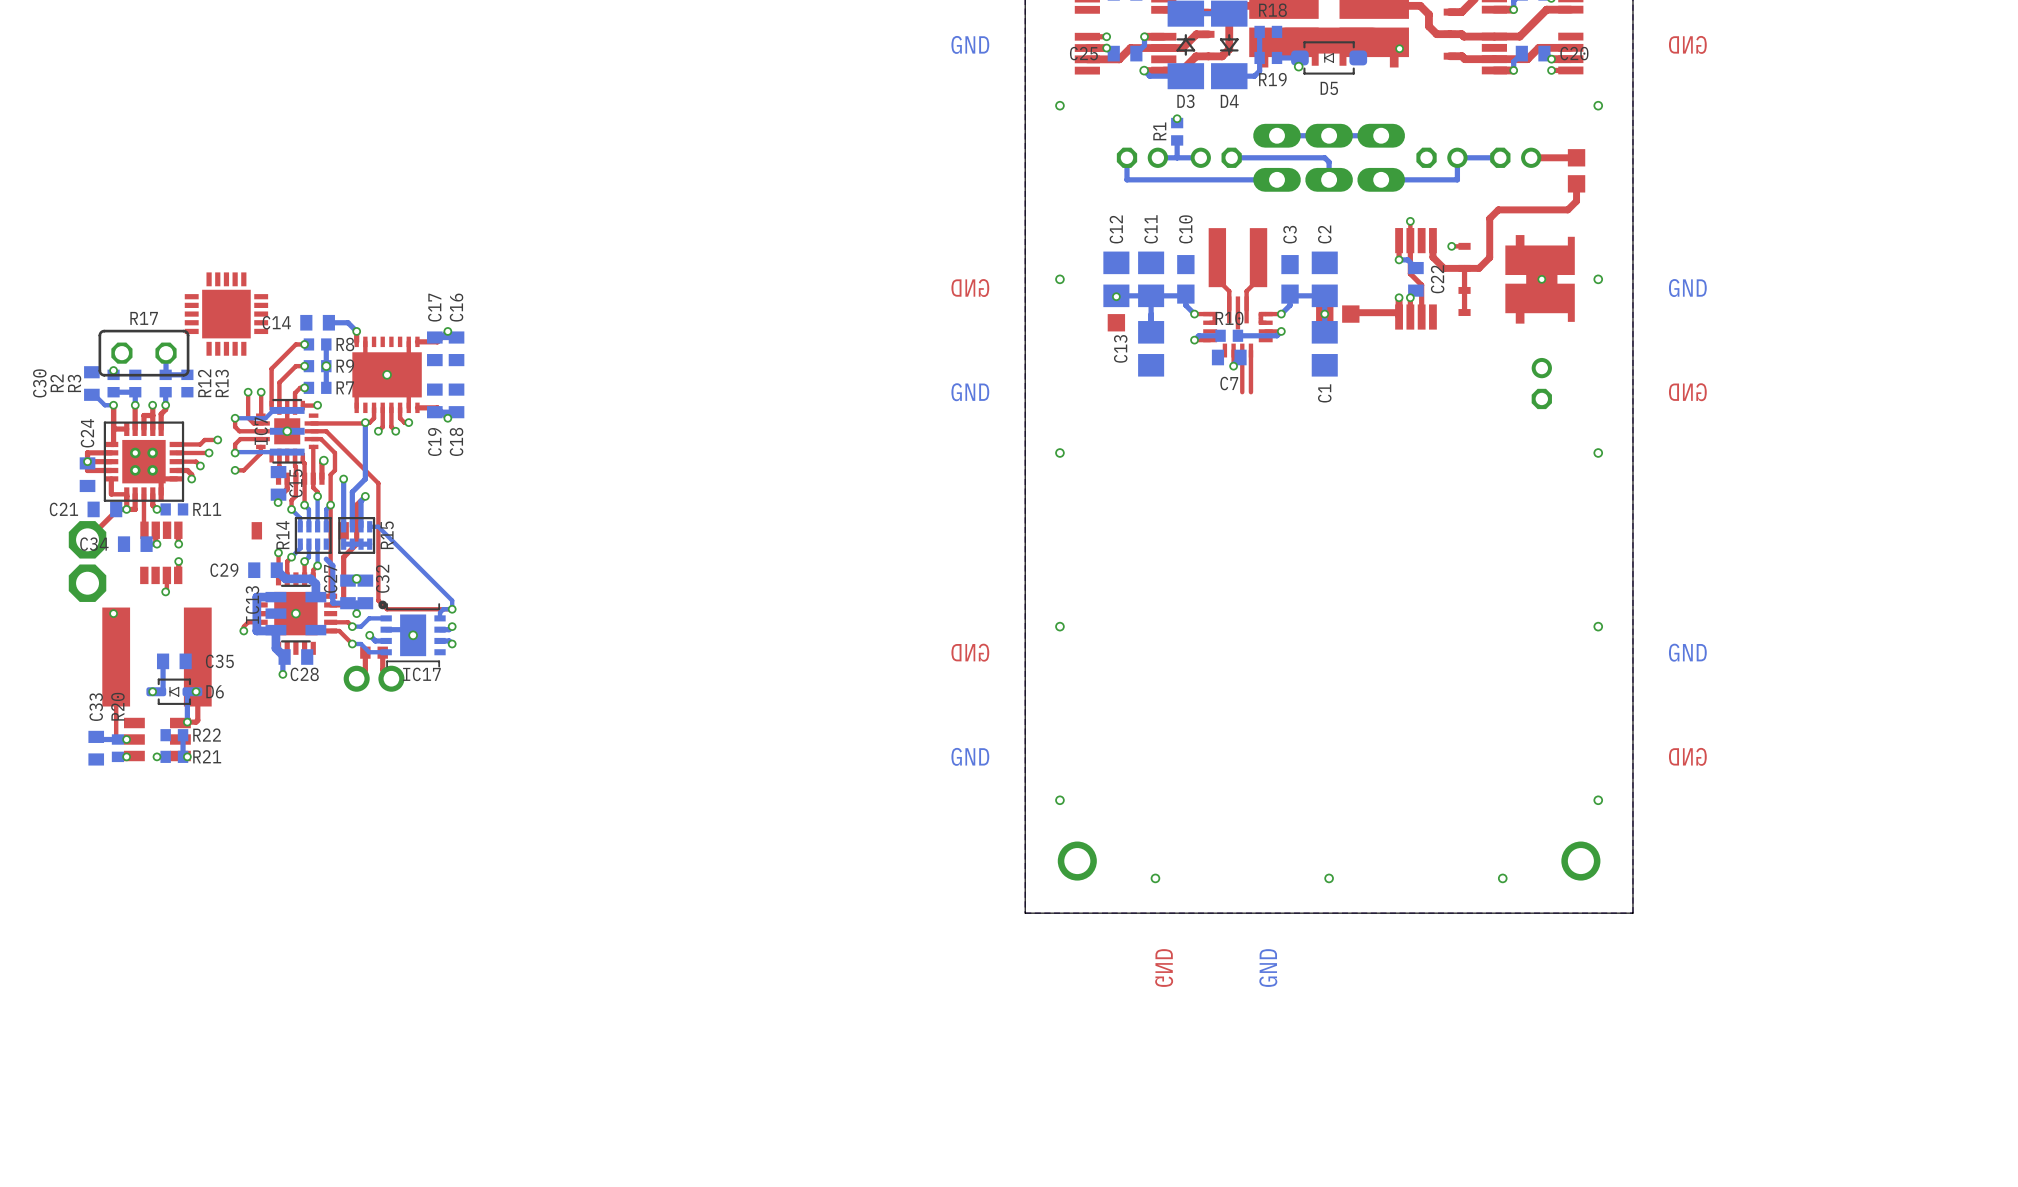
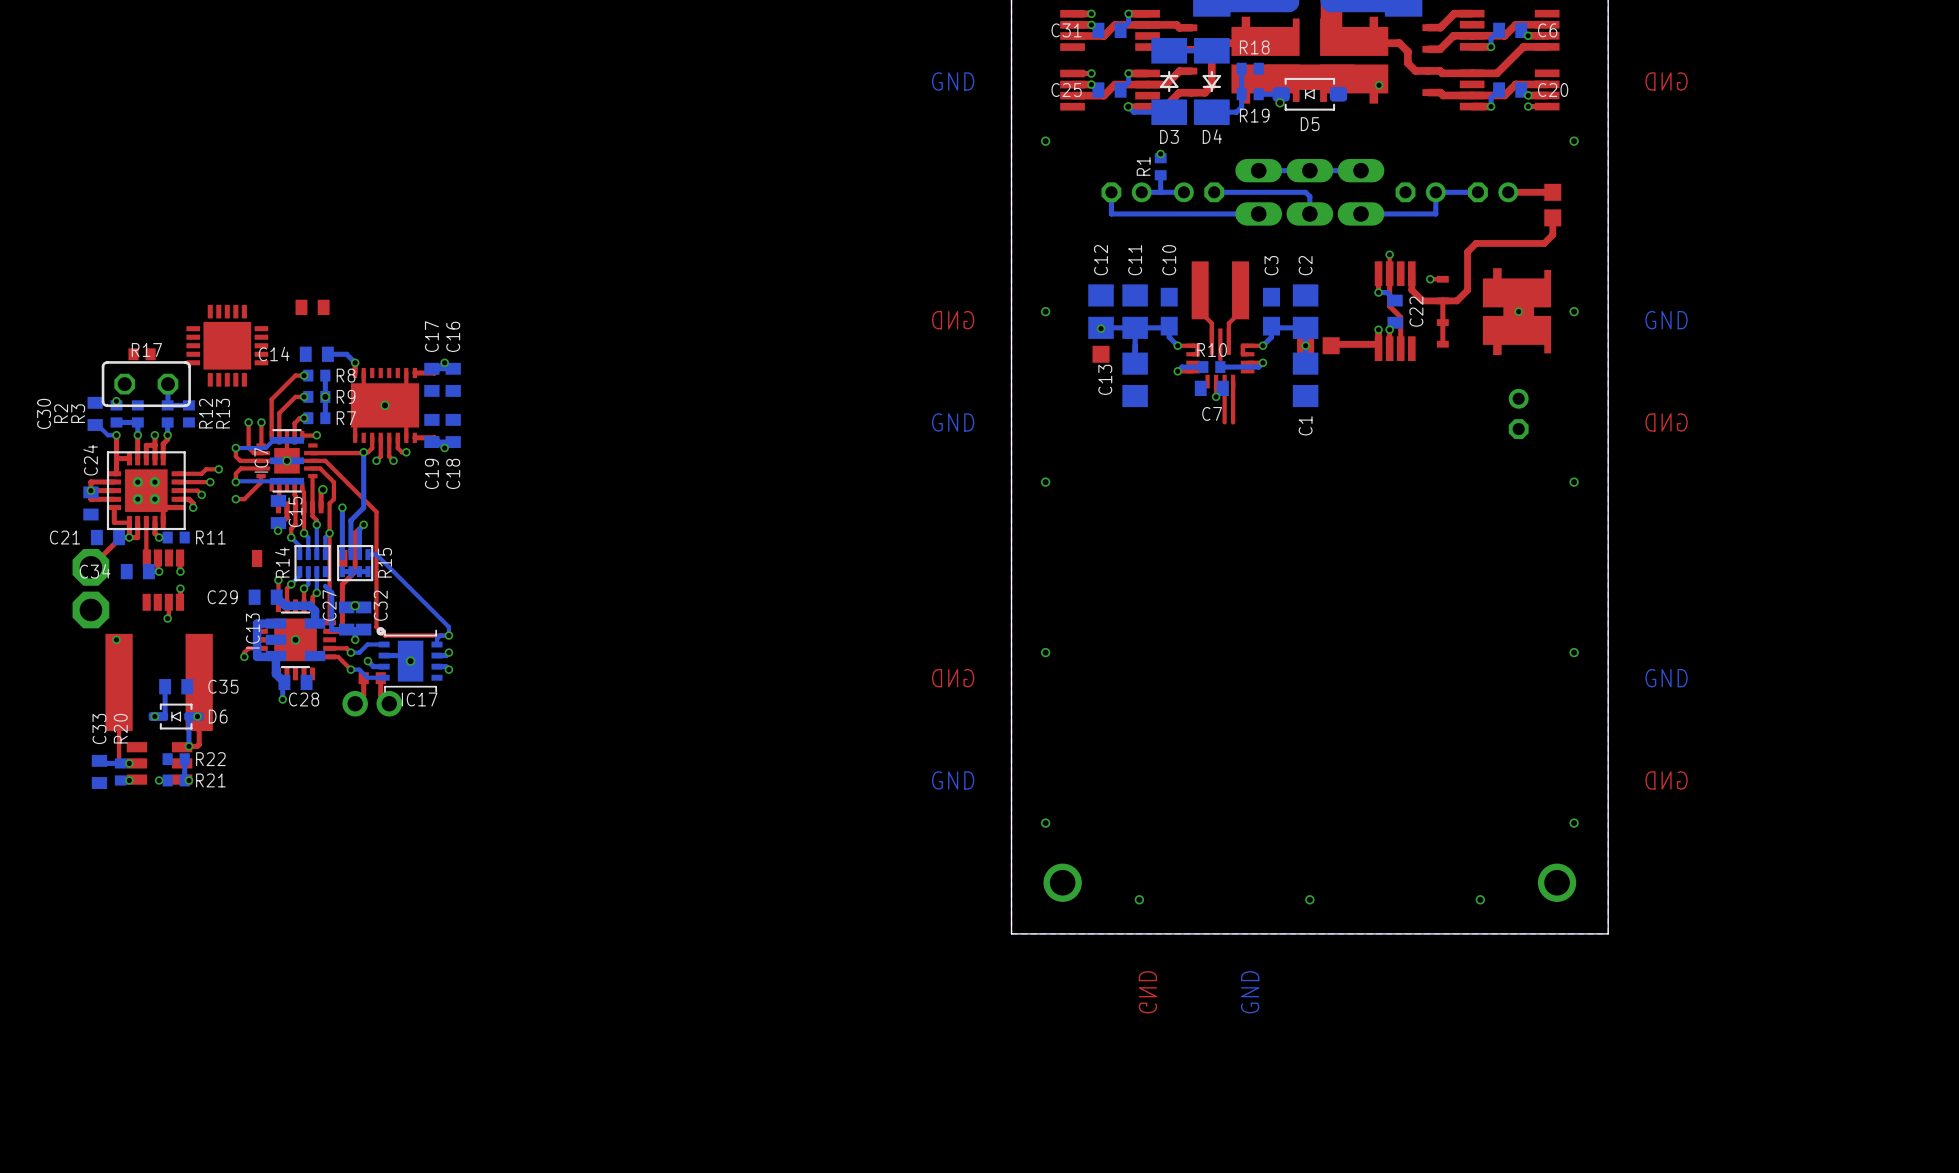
part: none -> (312, 307)
part: none -> (142, 354)

